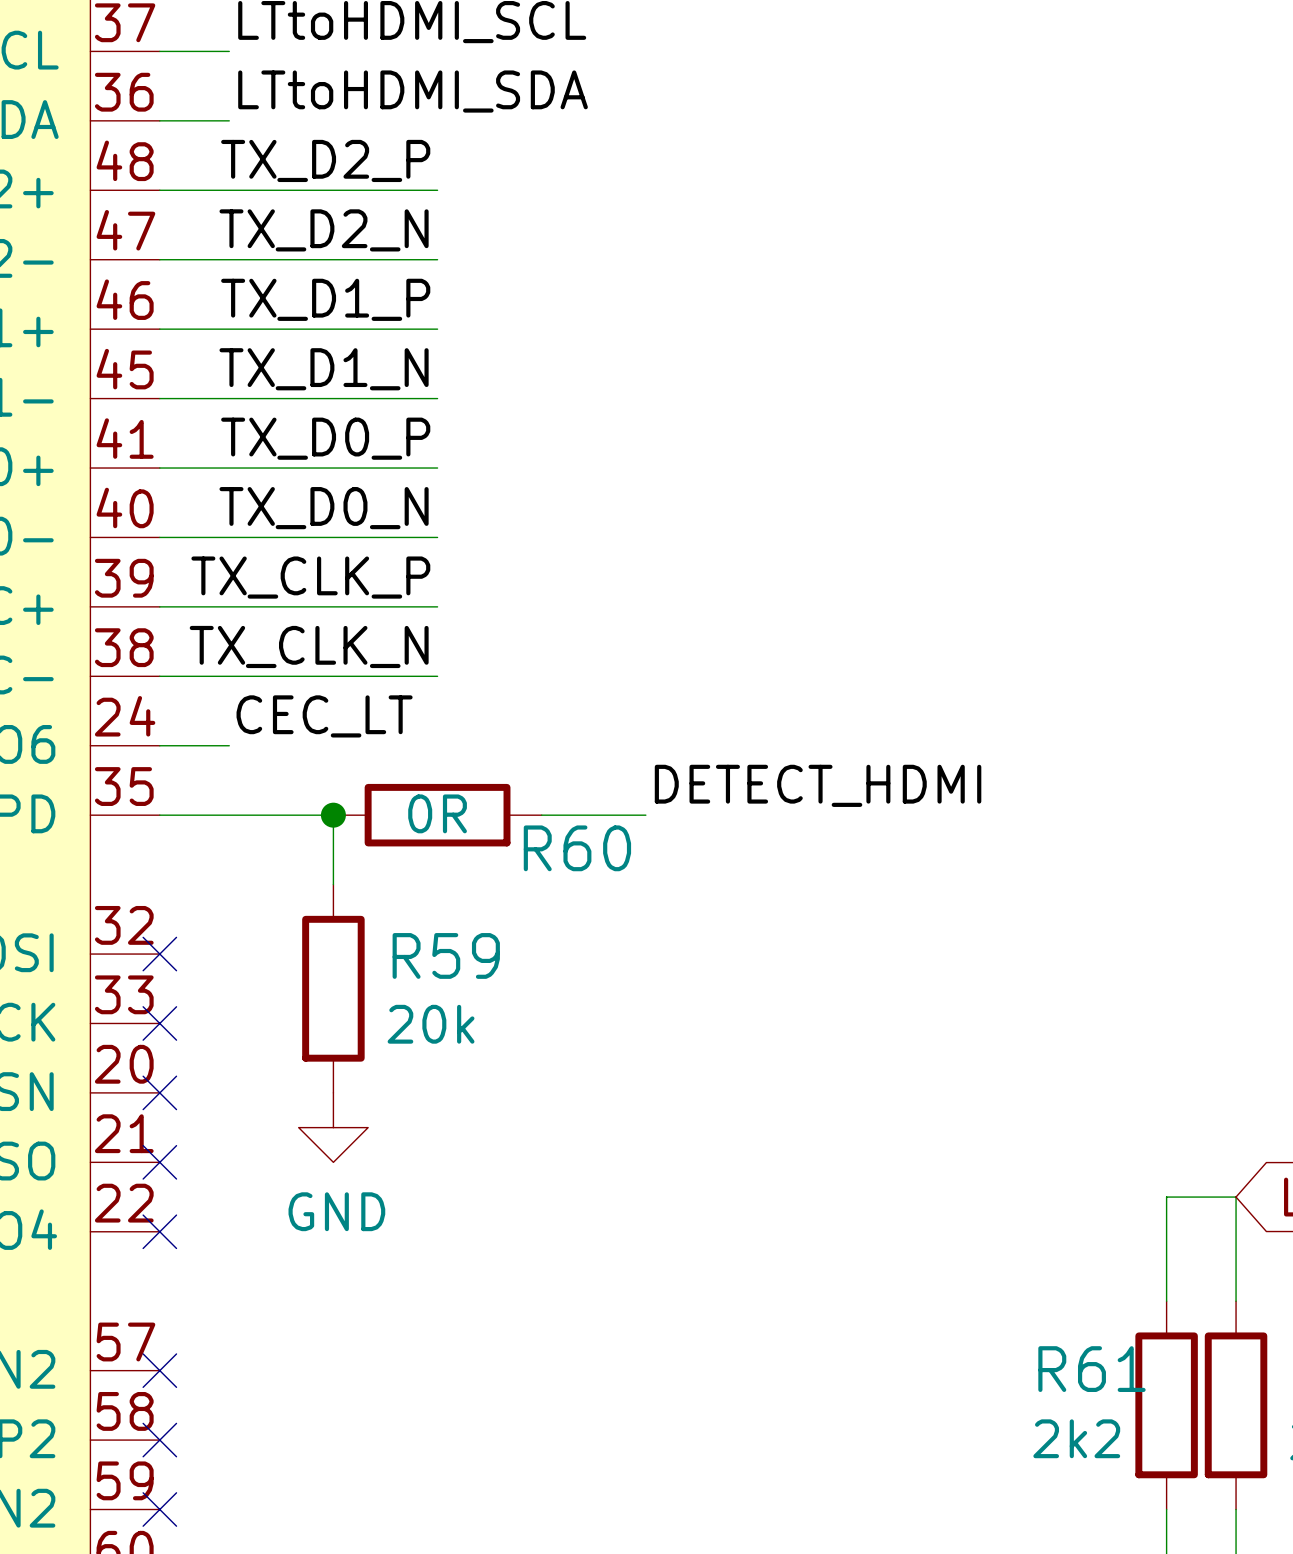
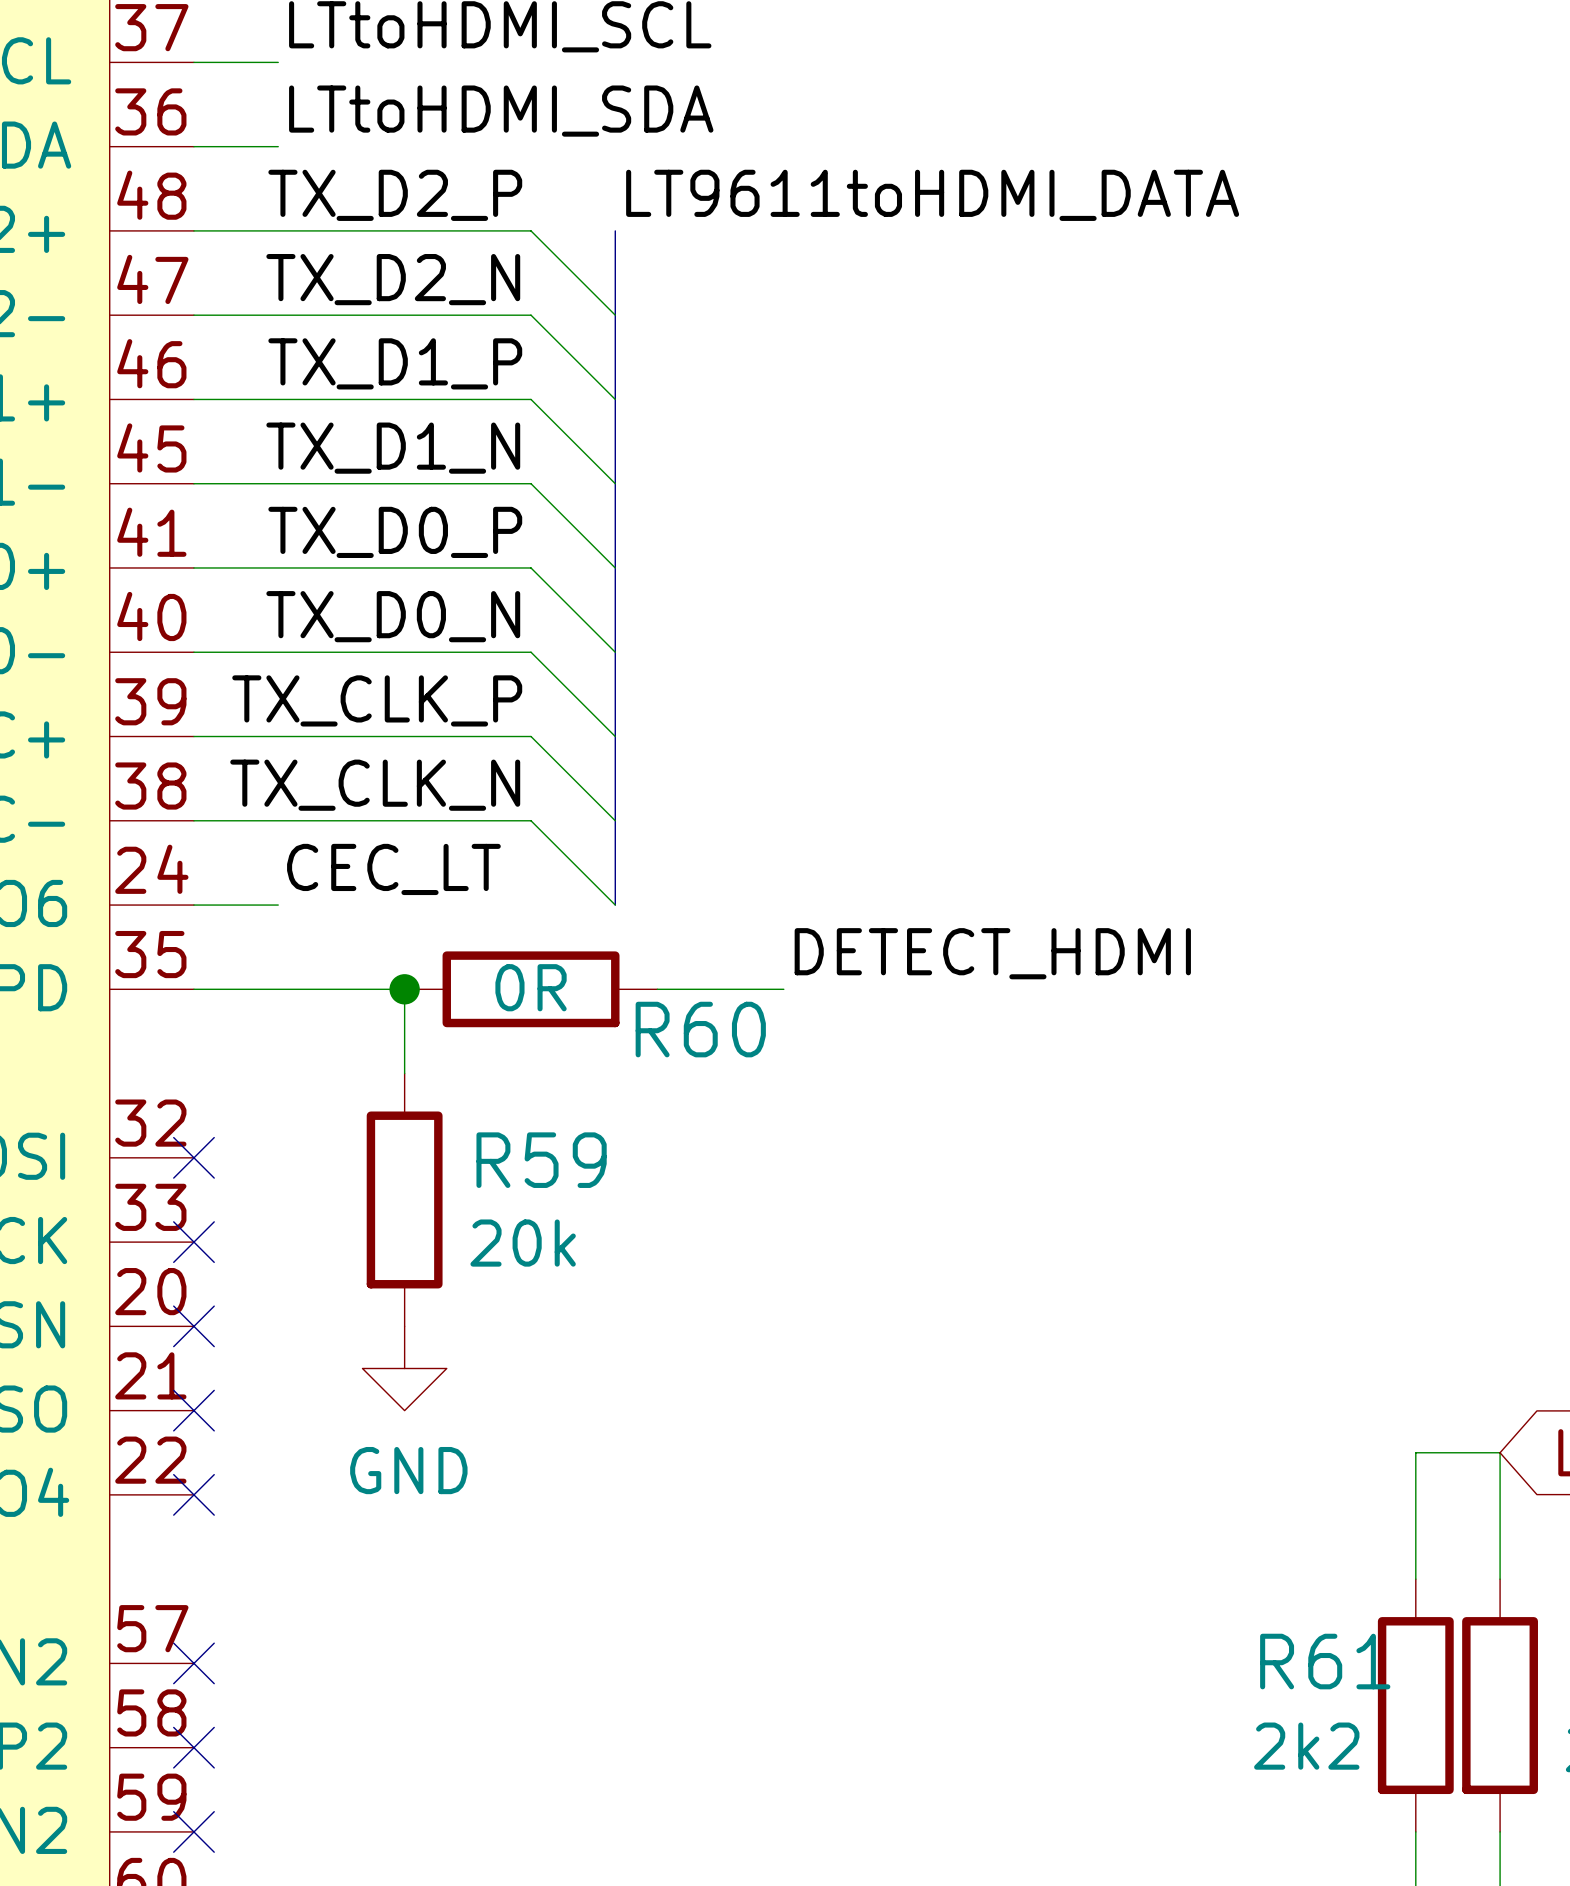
label: none -> LT9611toHDMI_DATA (932, 195)
wire: none -> (531, 230) (615, 315)
bus: none -> (615, 230) (615, 905)
wire: none -> (531, 315) (615, 399)
wire: none -> (531, 399) (615, 483)
wire: none -> (531, 483) (615, 567)
wire: none -> (531, 567) (615, 652)
wire: none -> (531, 652) (615, 736)
wire: none -> (531, 736) (615, 820)
wire: none -> (531, 820) (615, 905)

